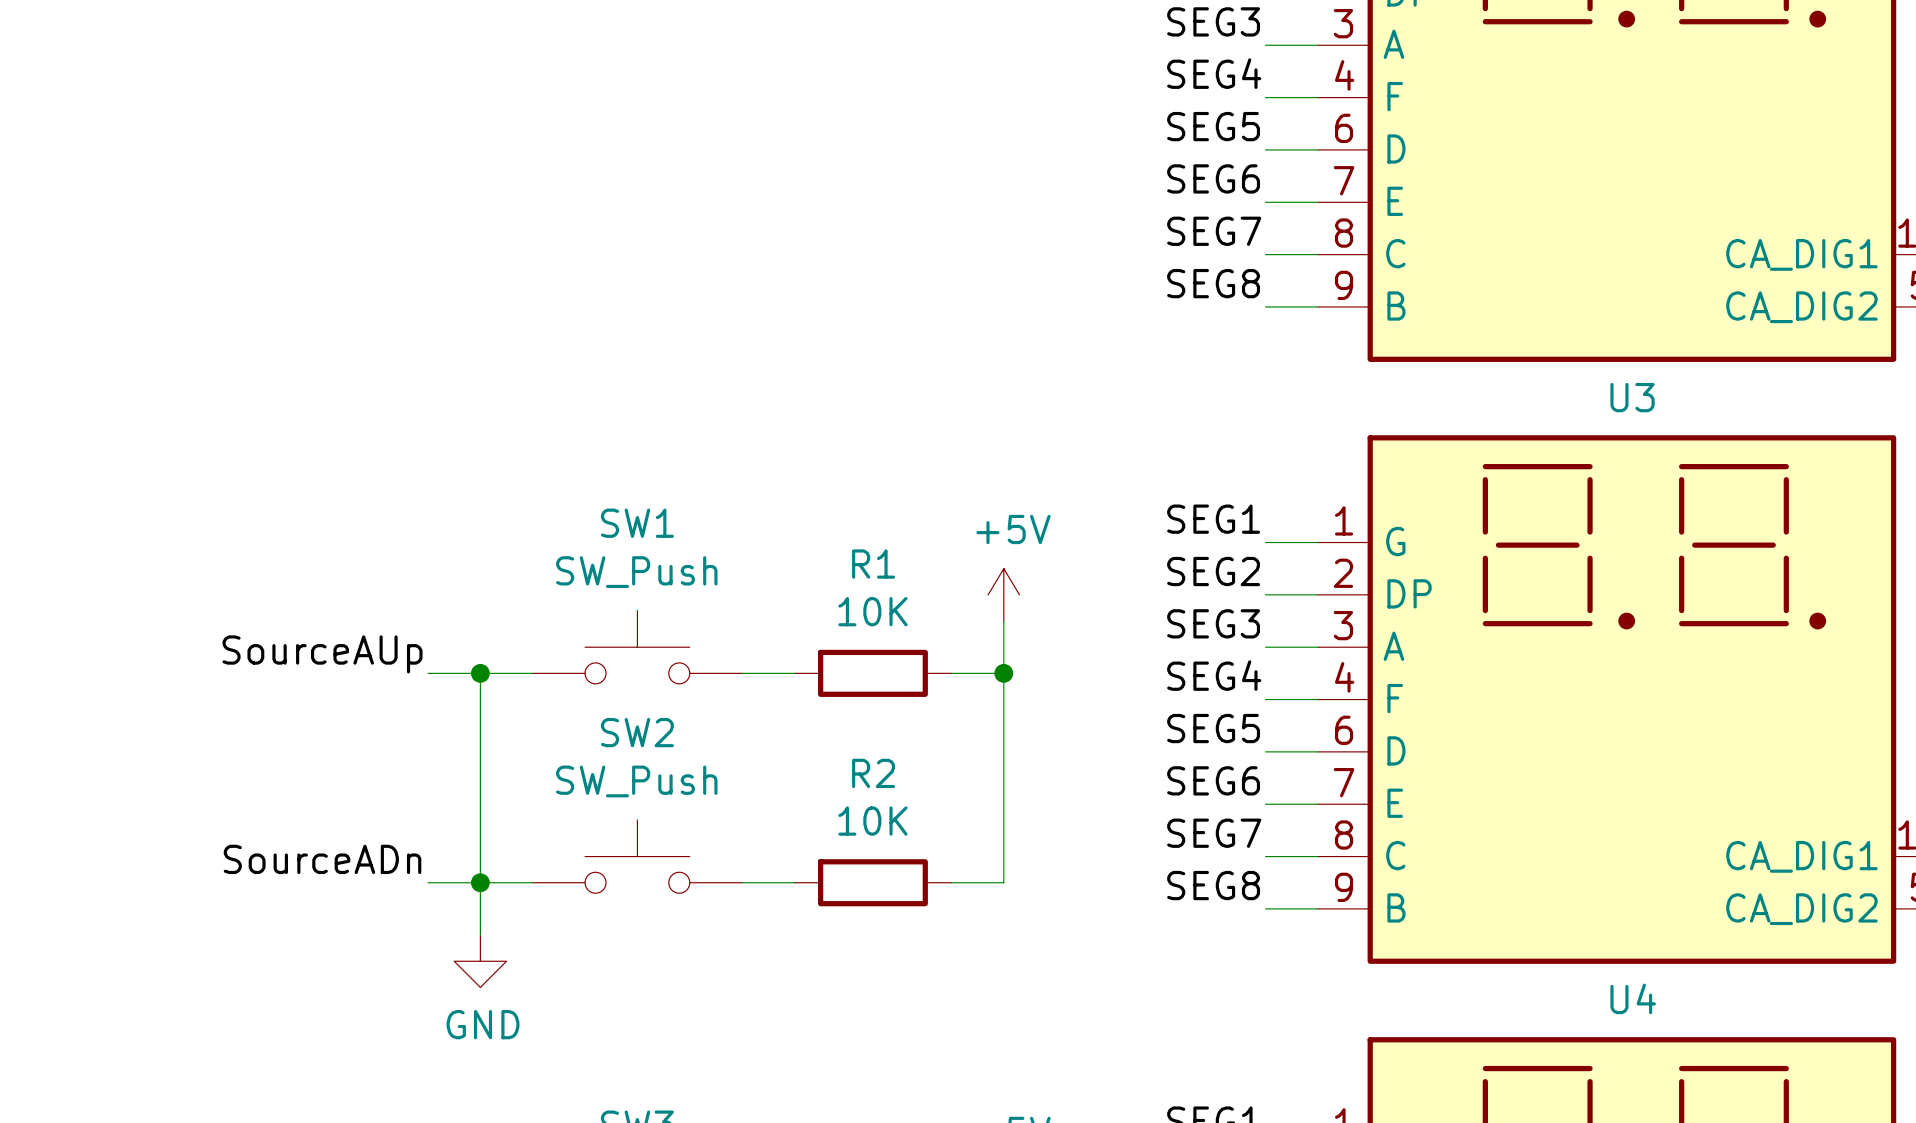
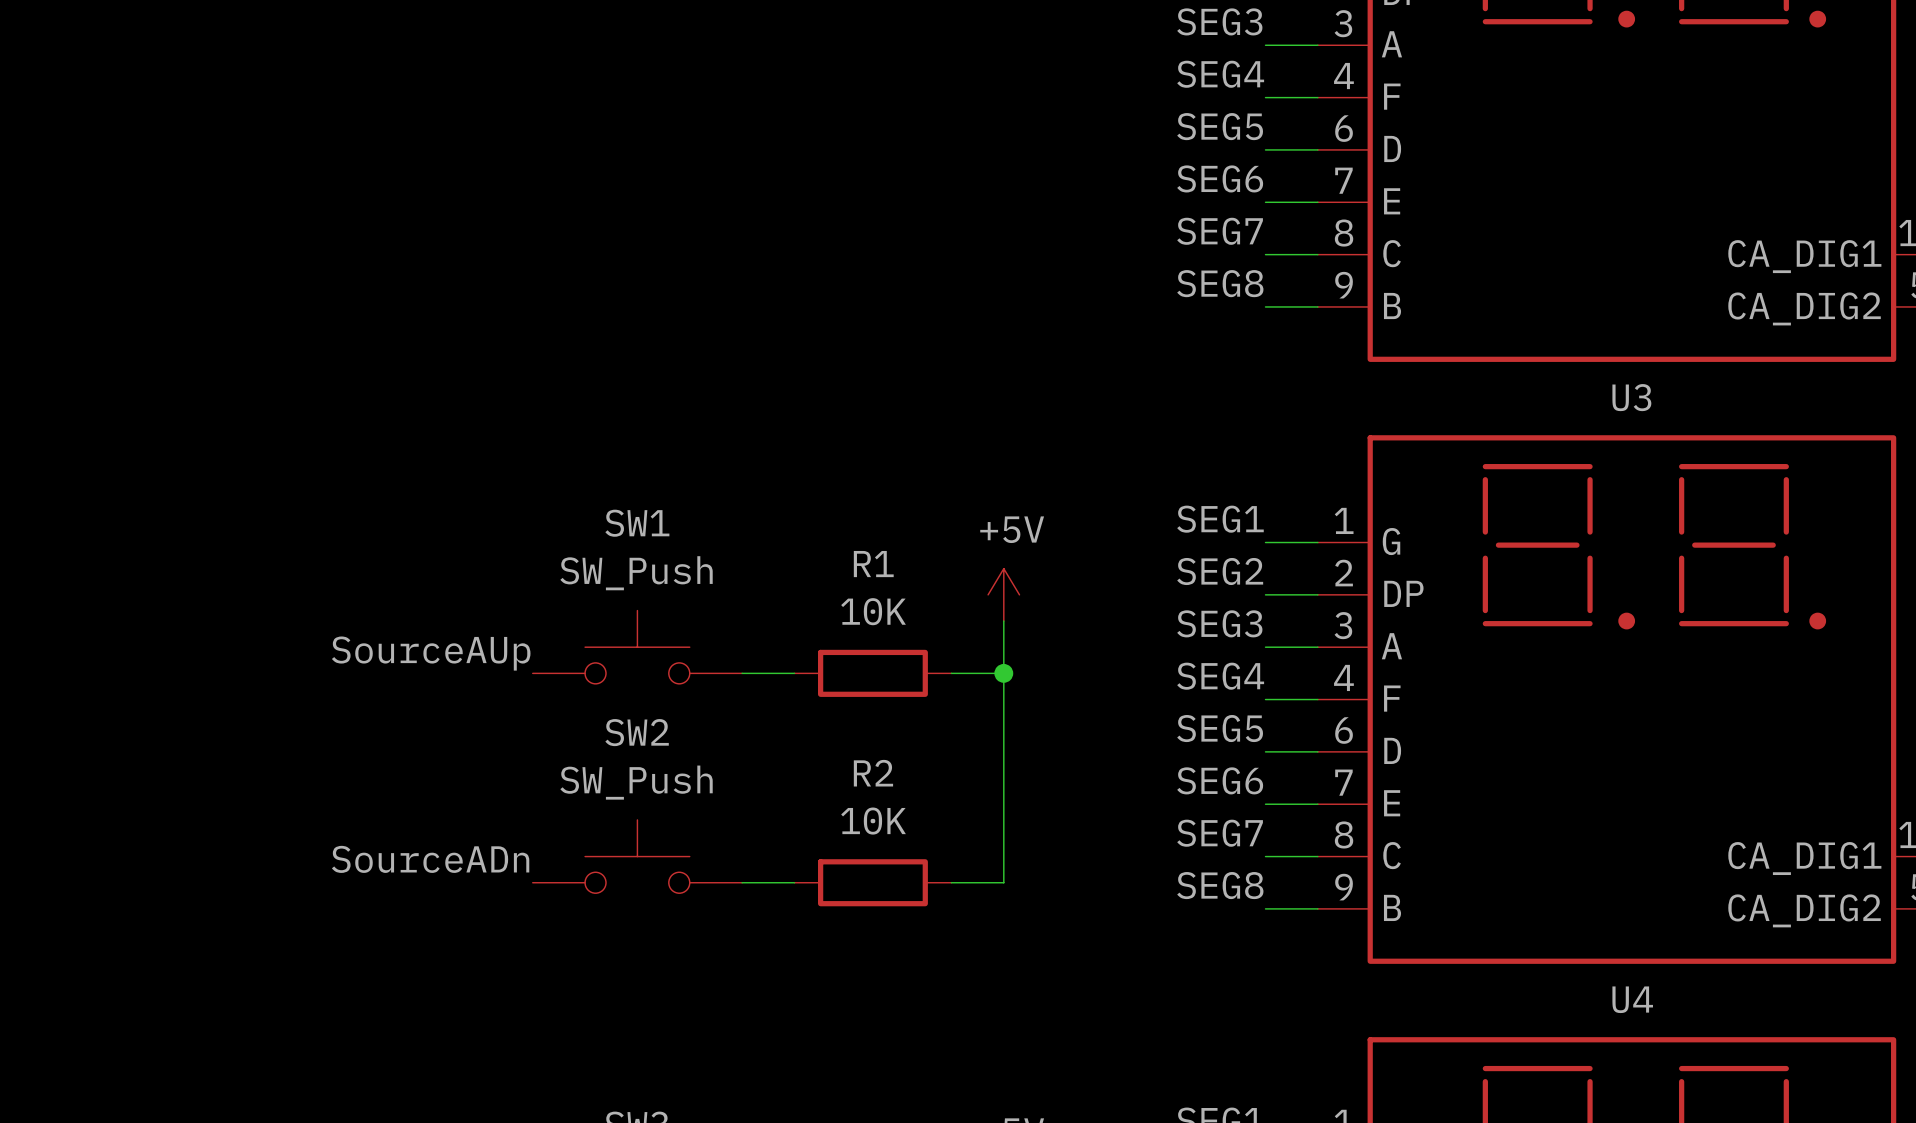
label position: SourceAUp (322, 654) -> SourceAUp (431, 653)
wire: (428, 673) (532, 673) -> none
wire: (480, 673) (480, 935) -> none
junction: (480, 673) -> none
label position: SourceADn (322, 859) -> SourceADn (430, 859)
wire: (428, 882) (532, 882) -> none
junction: (480, 882) -> none
power symbol: GND (480, 961) -> none

